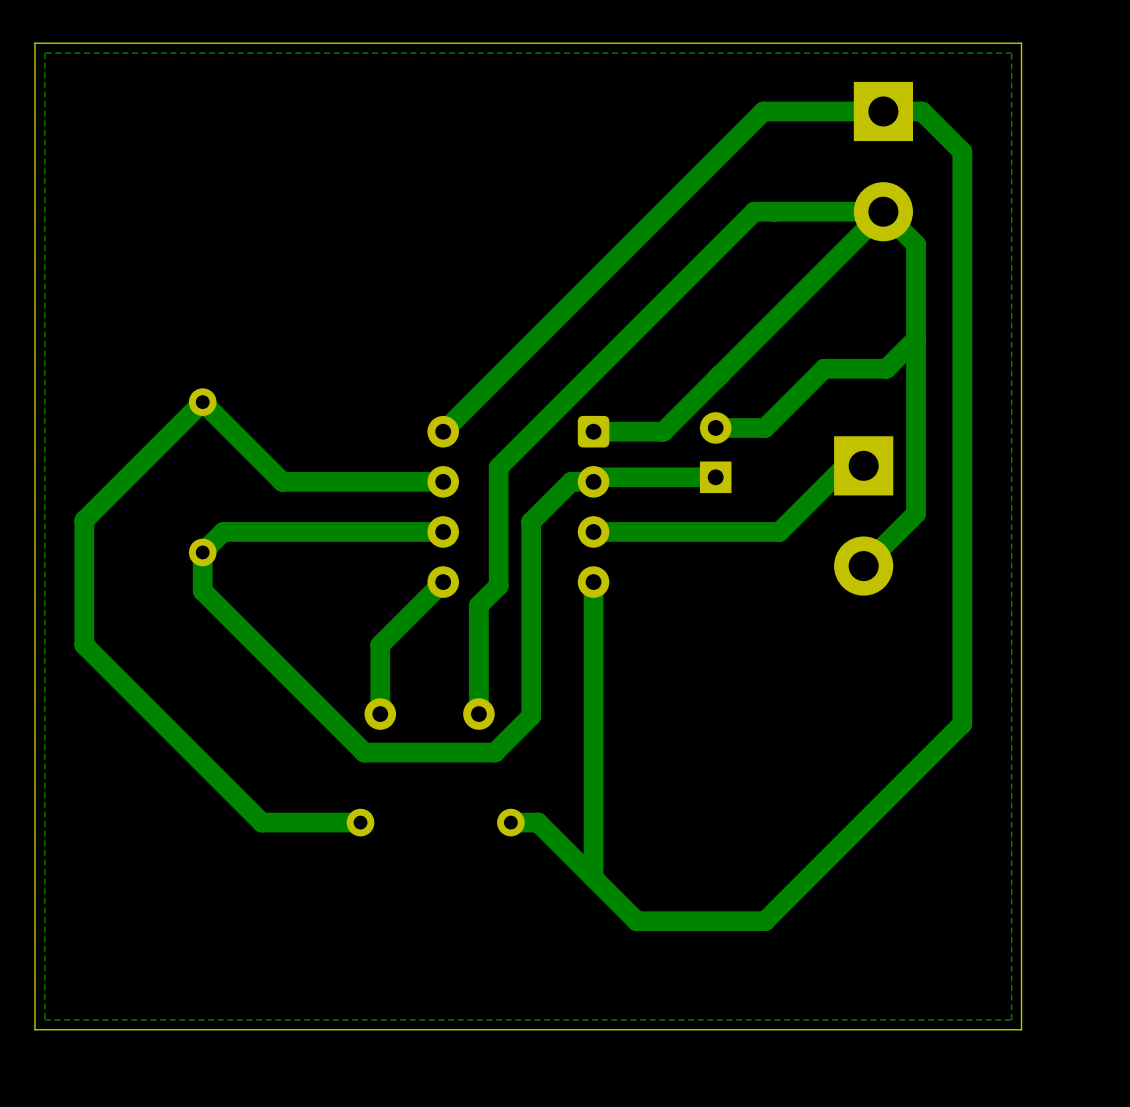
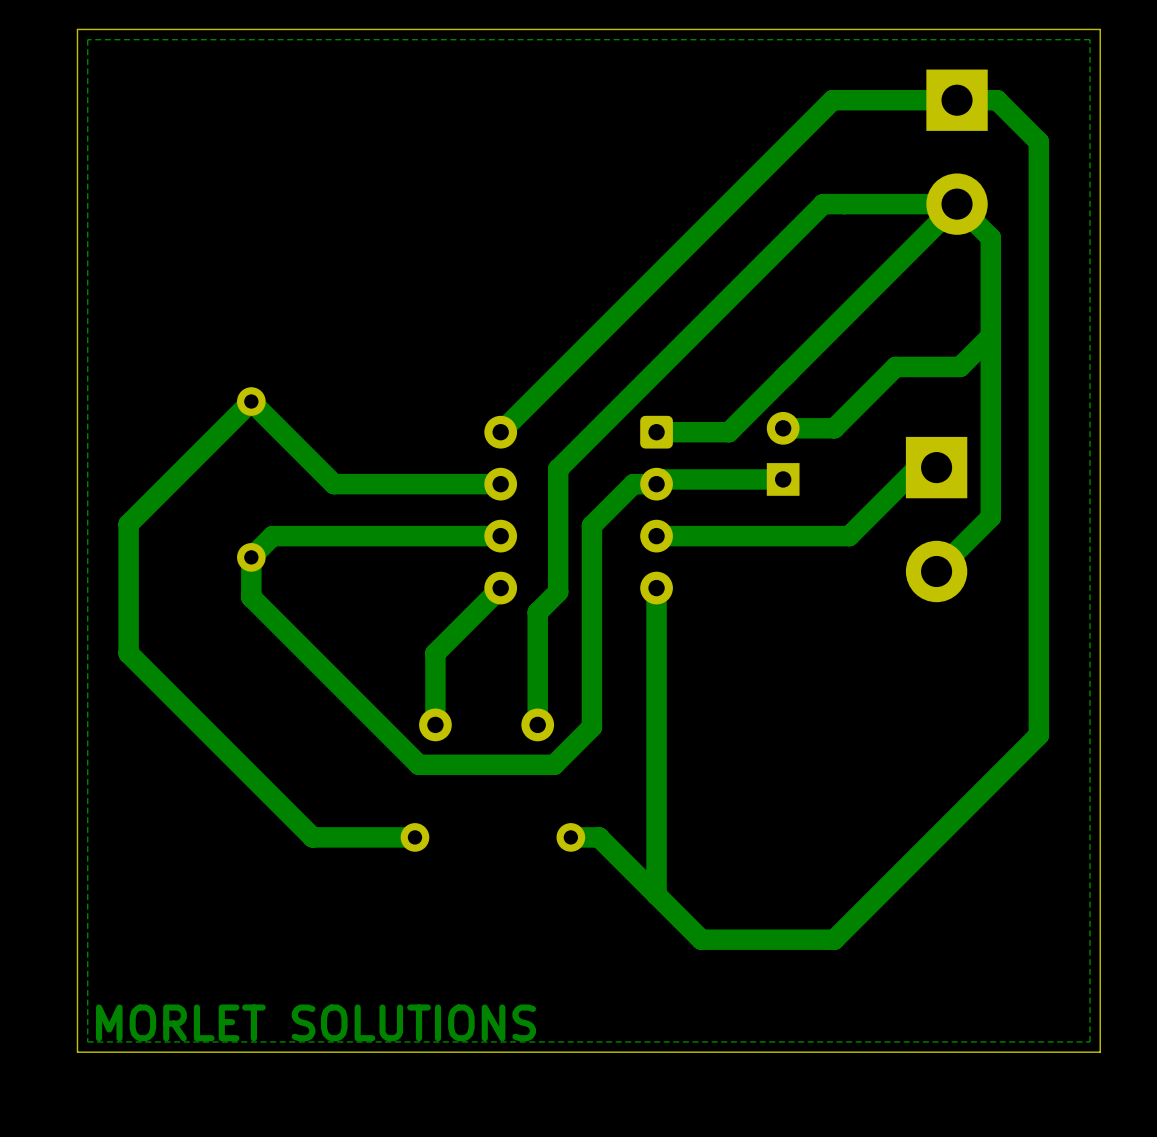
text: none -> MORLET SOLUTIONS (316, 1022)

